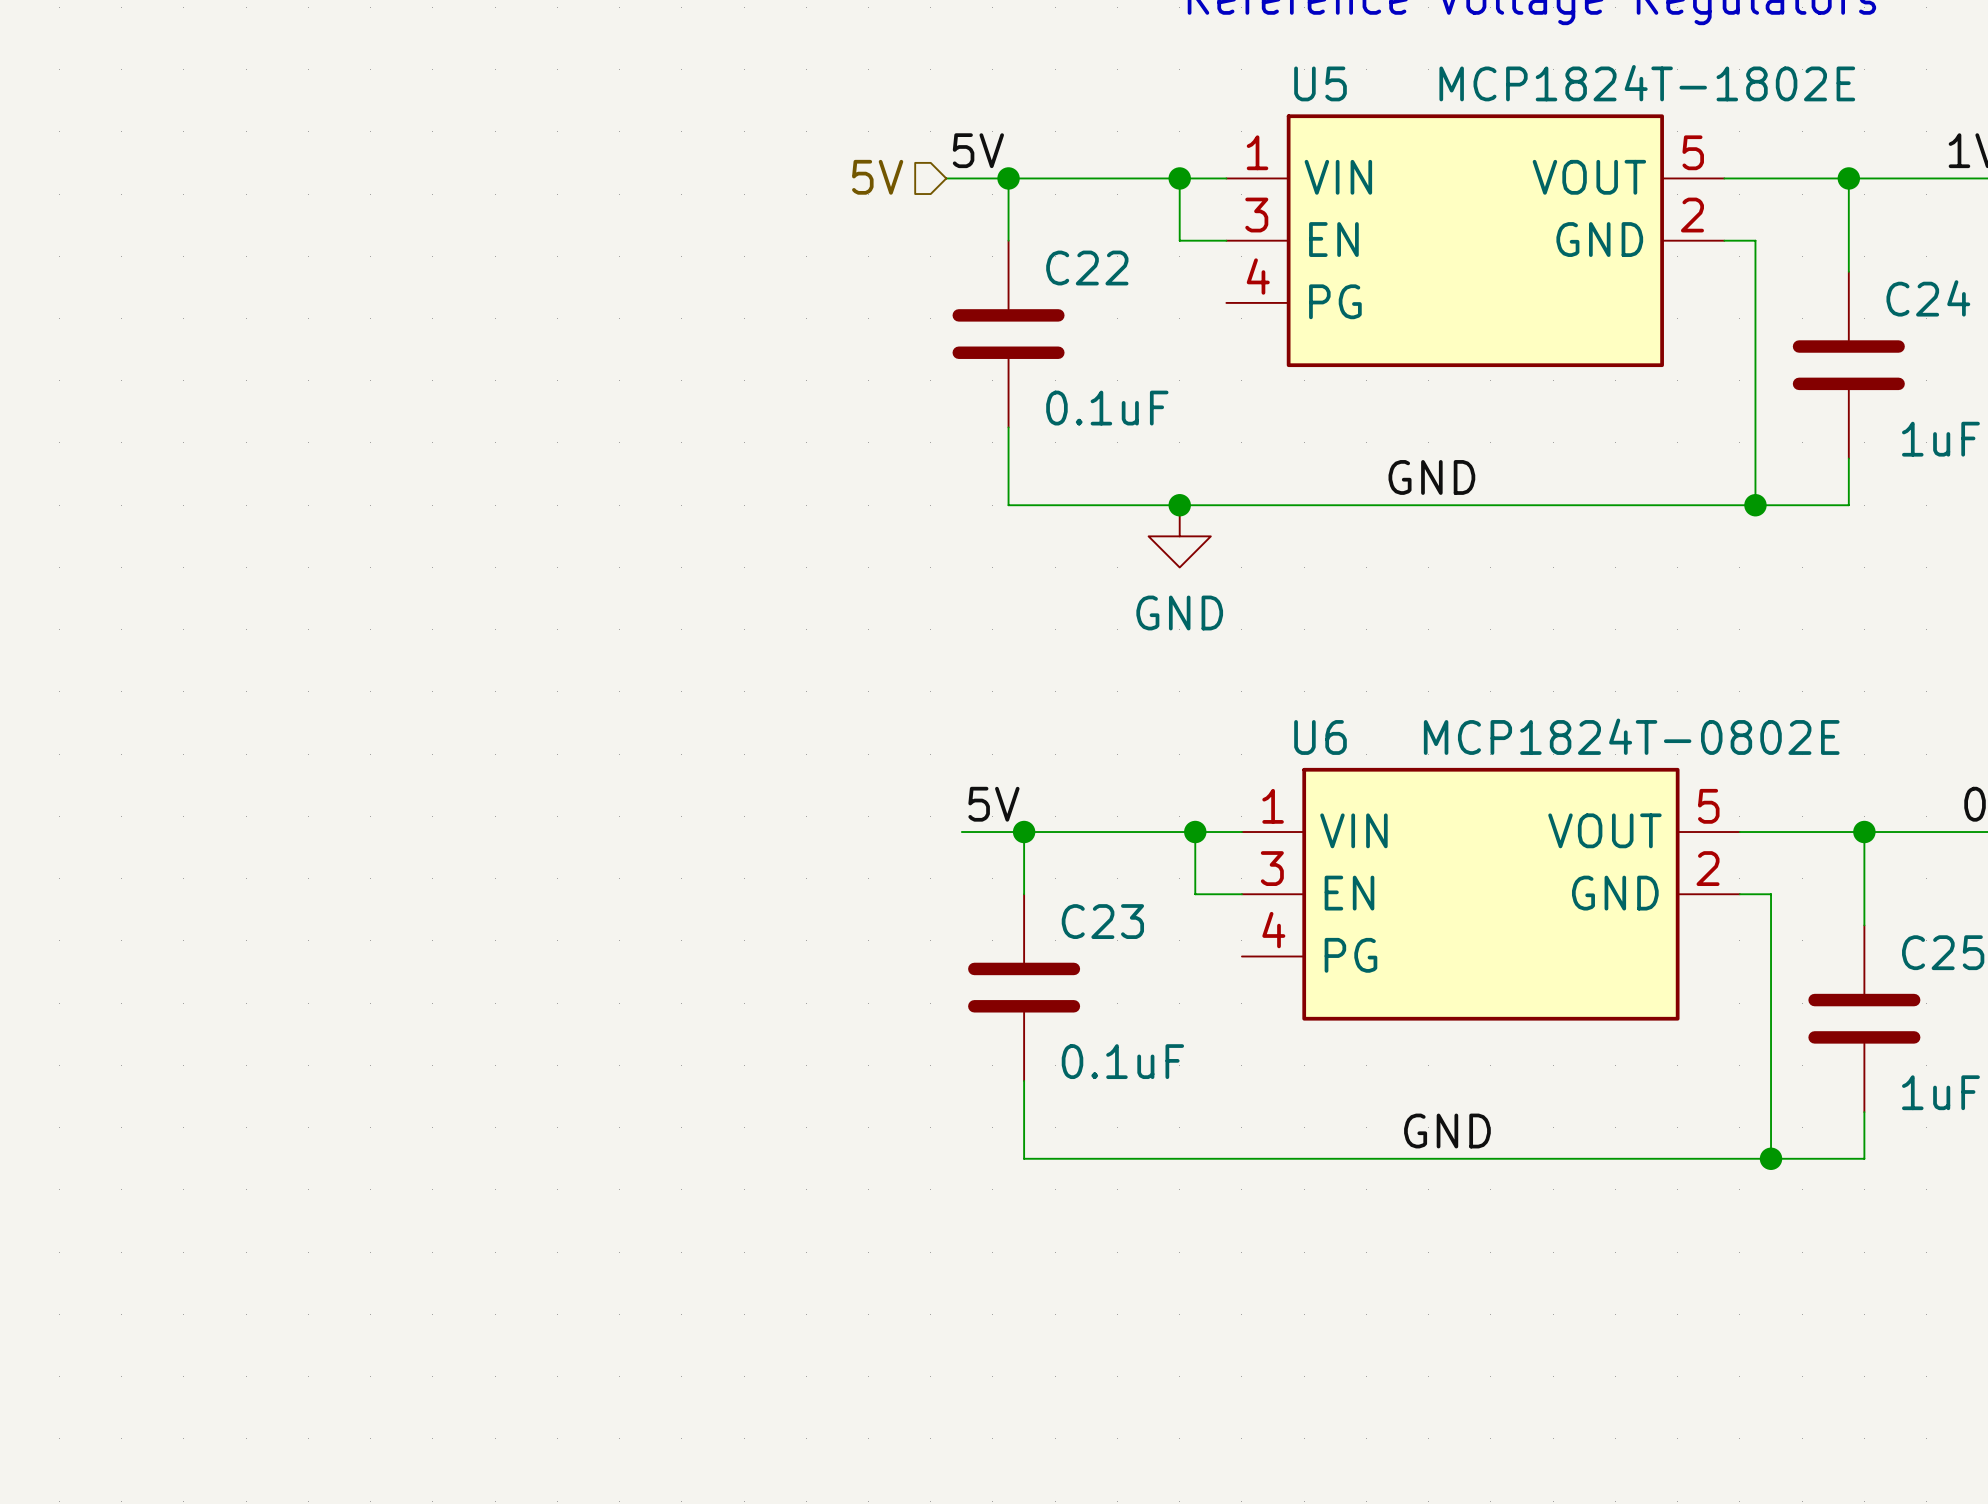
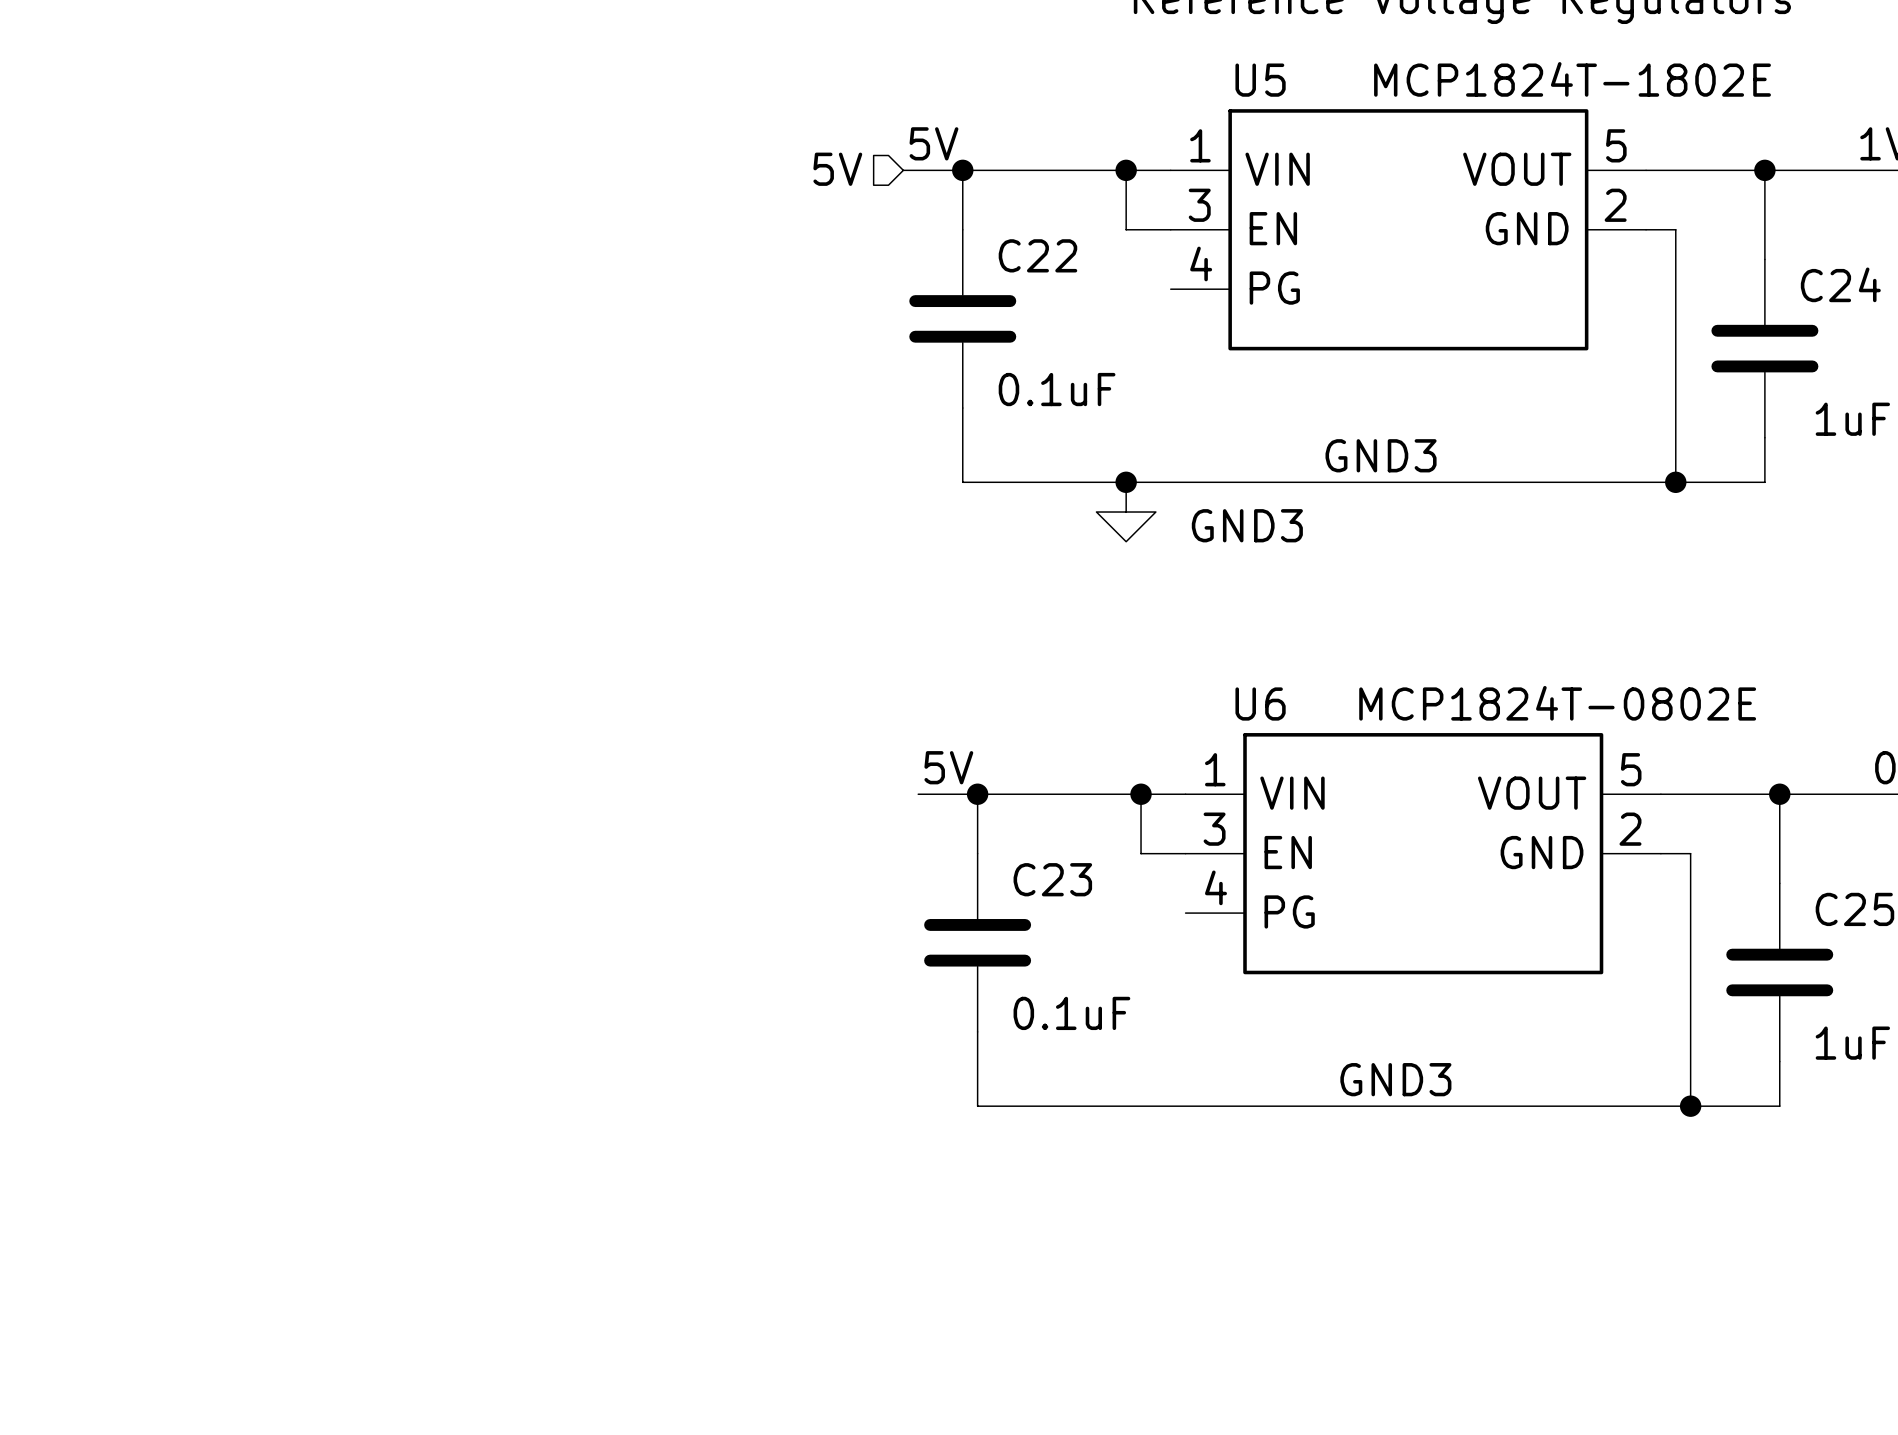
label: GND (1431, 477) -> GND3 (1381, 455)
power symbol: GND (1179, 536) -> GND3 (1126, 512)
label: GND (1447, 1131) -> GND3 (1395, 1079)

